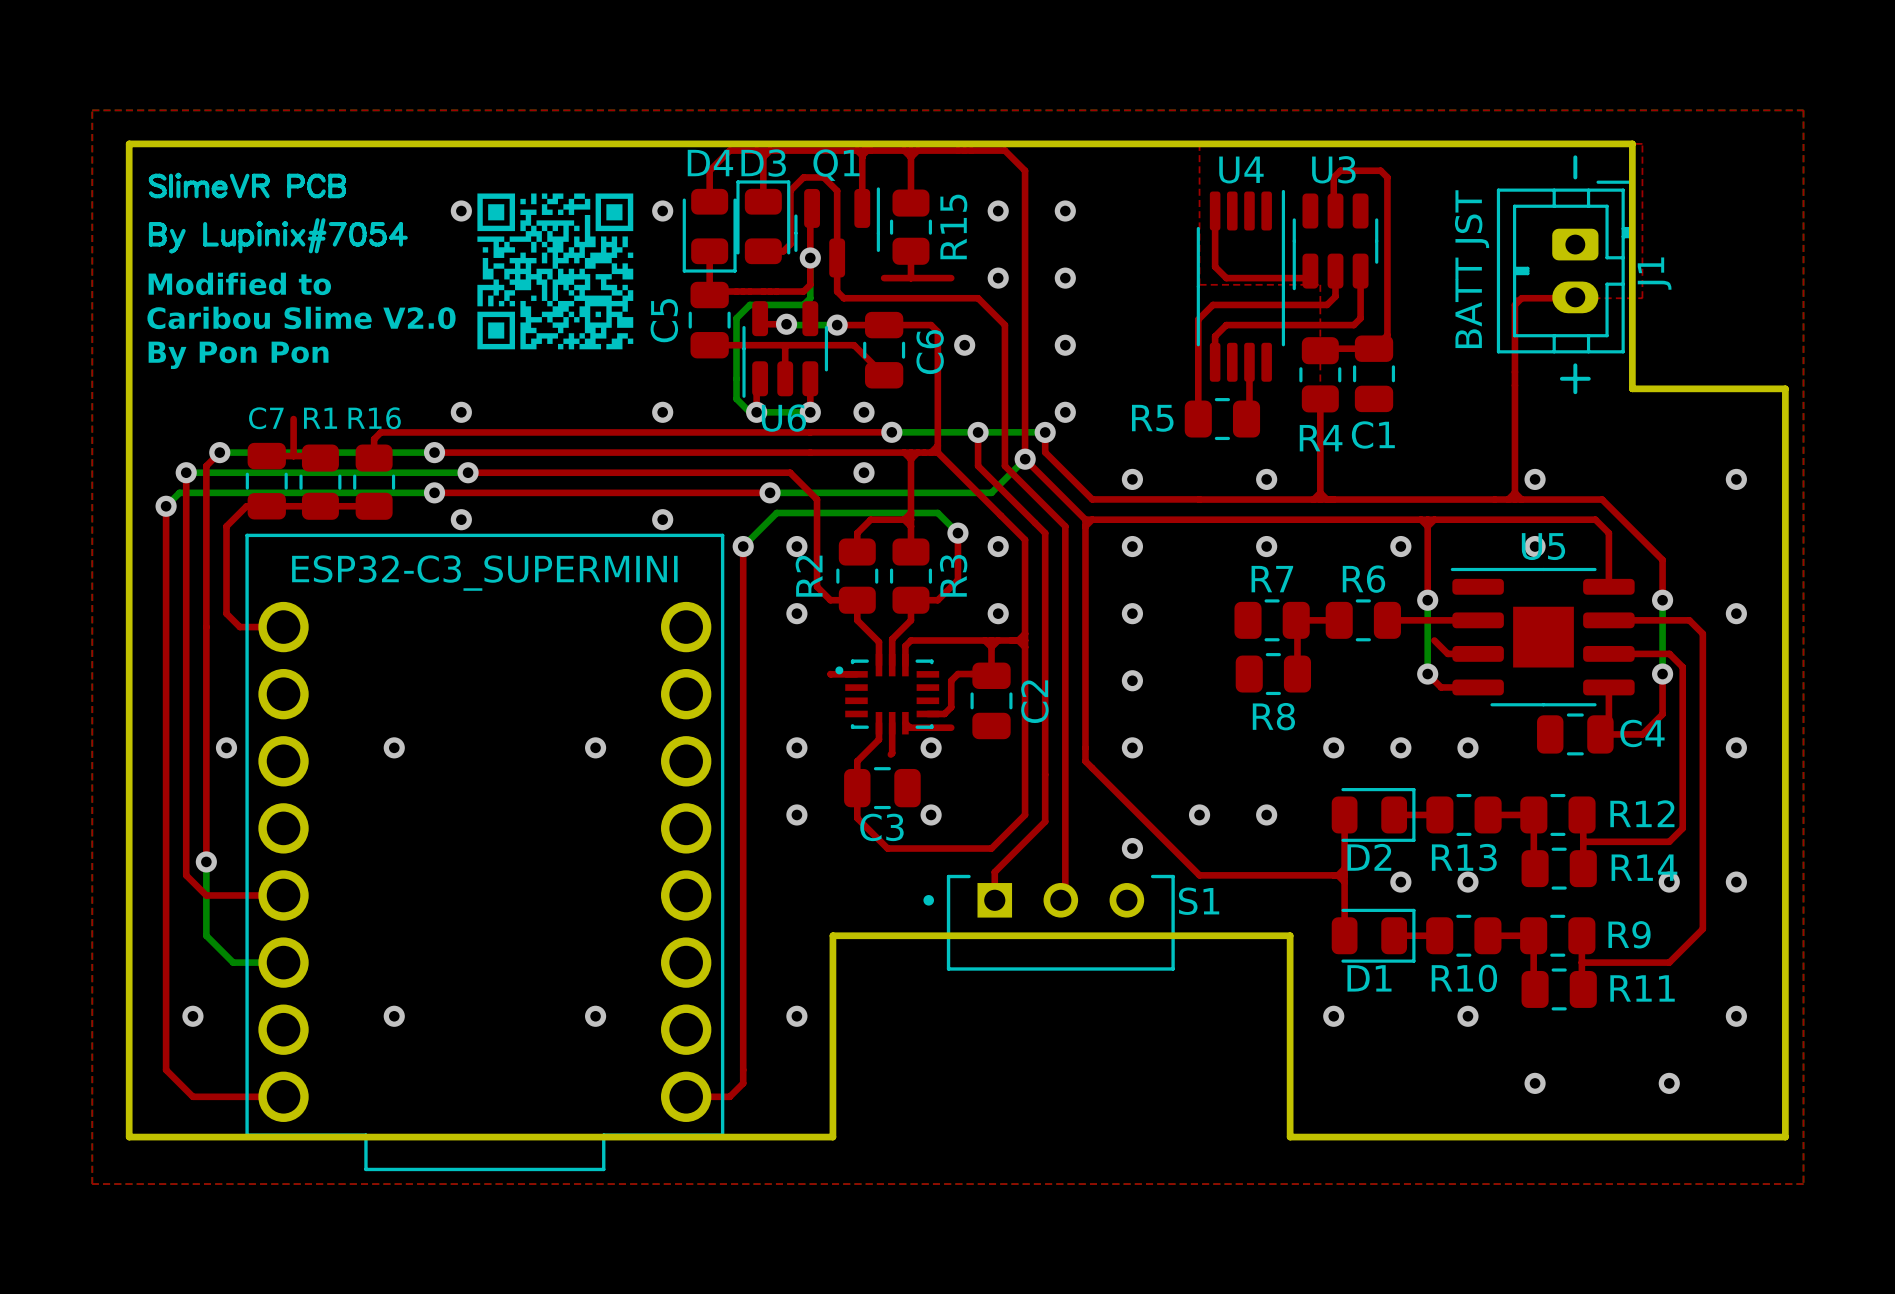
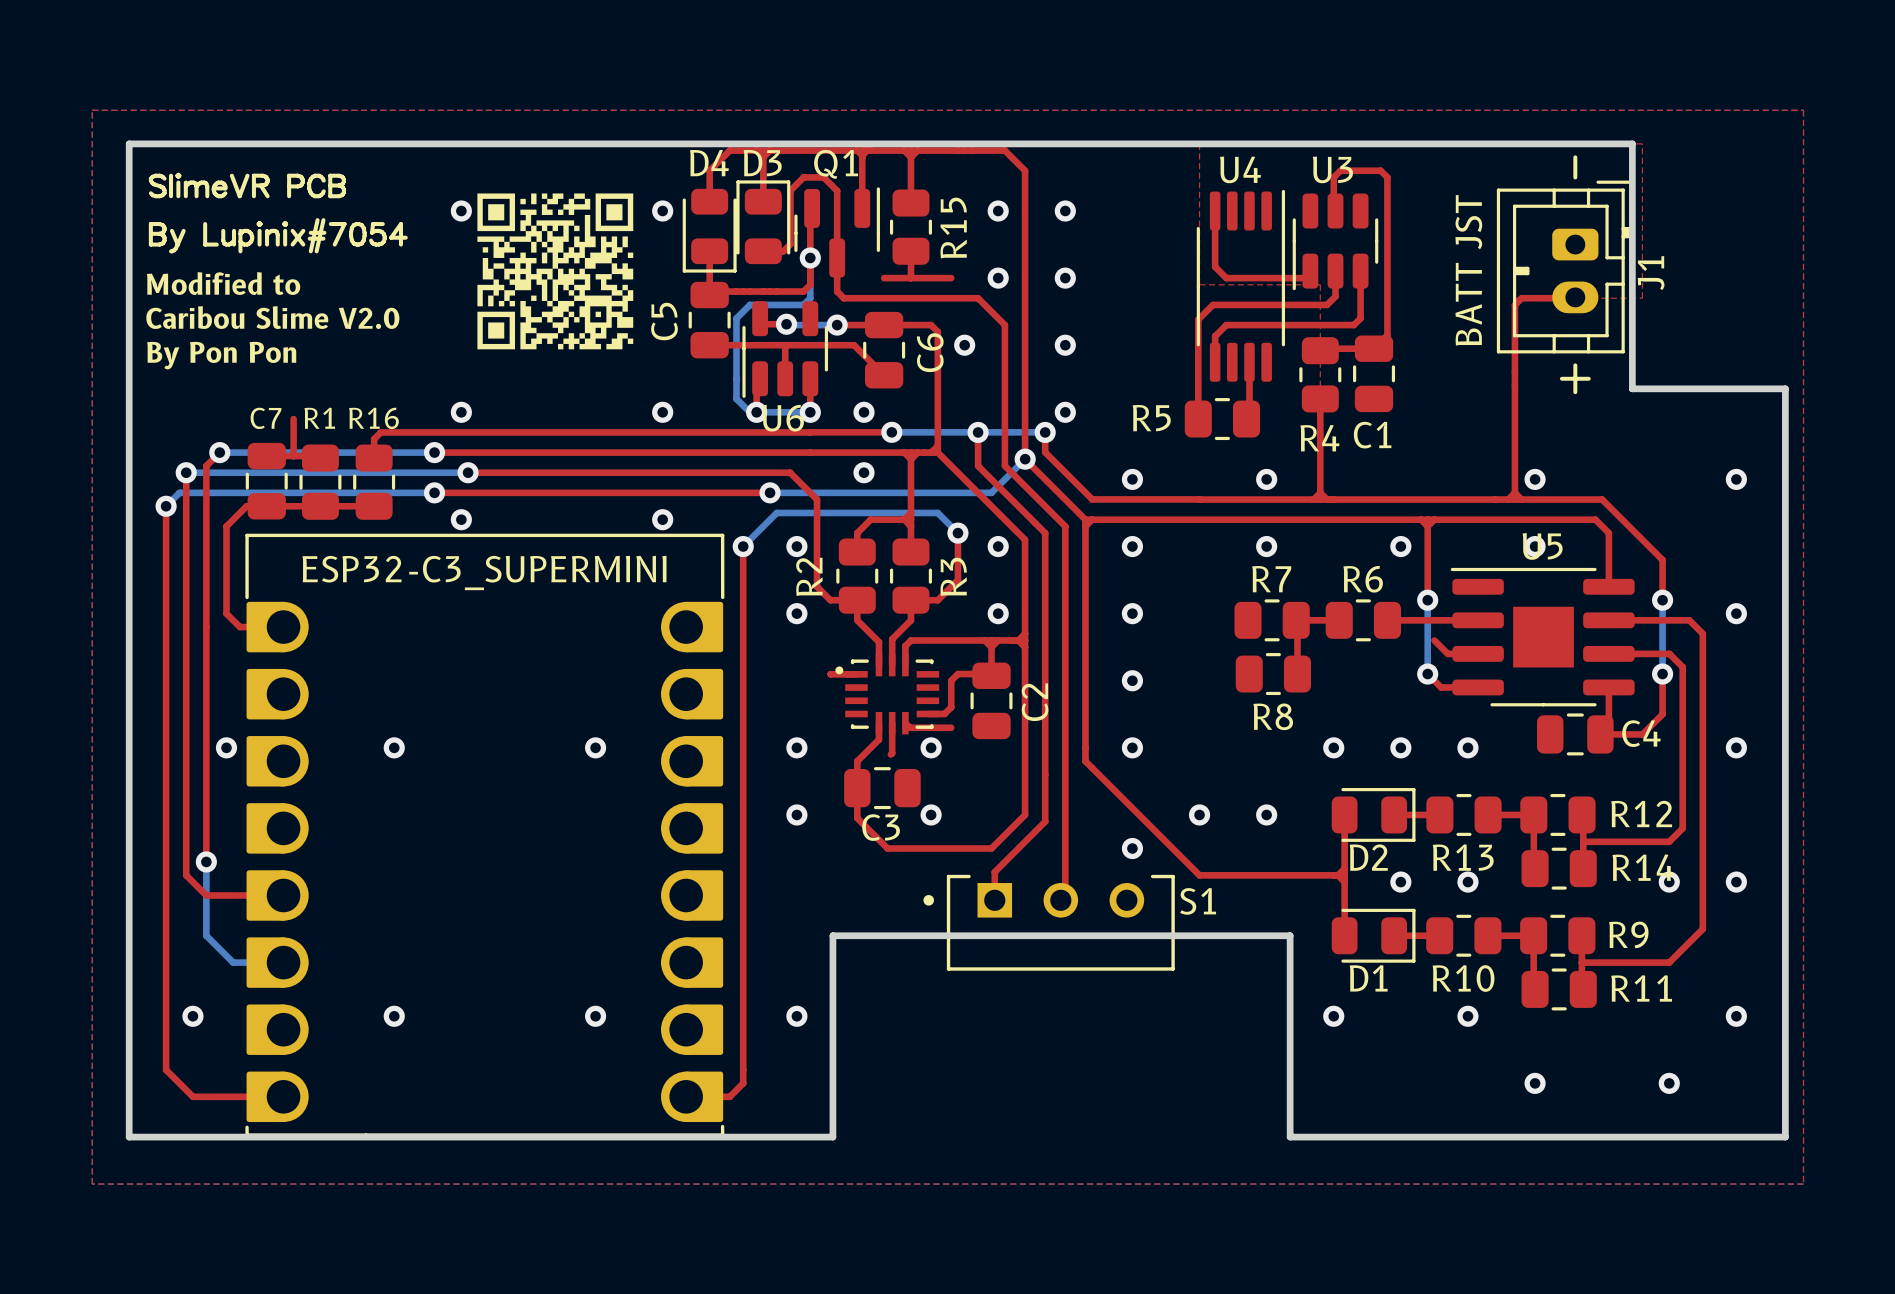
part footprint: [245, 533, 725, 1172] -> [245, 533, 725, 1137]

